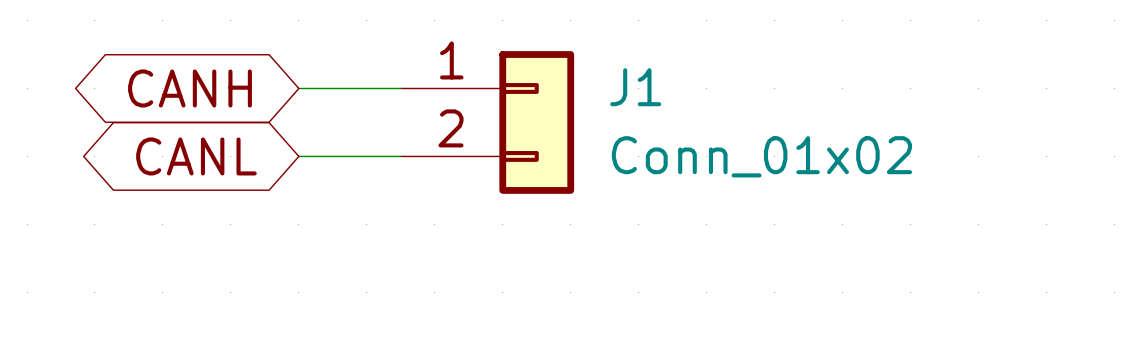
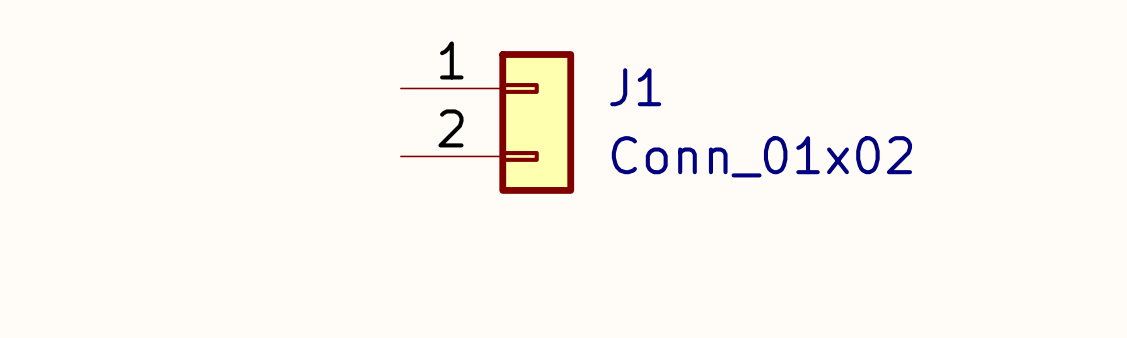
global label: CANH (189, 88) -> none
wire: (298, 88) (400, 88) -> none
global label: CANL (196, 156) -> none
wire: (298, 156) (400, 156) -> none

